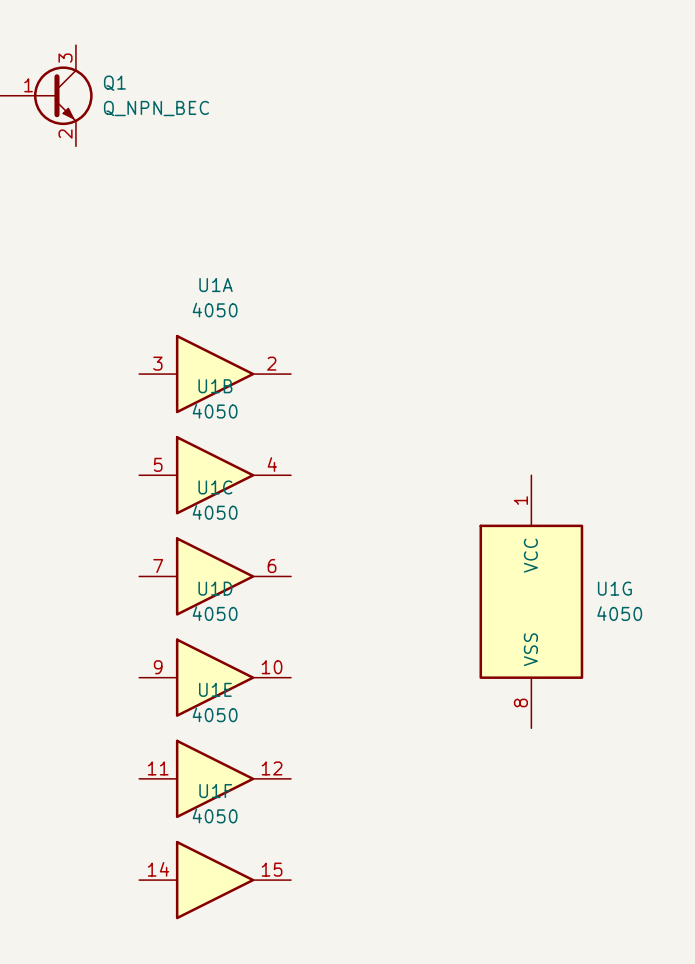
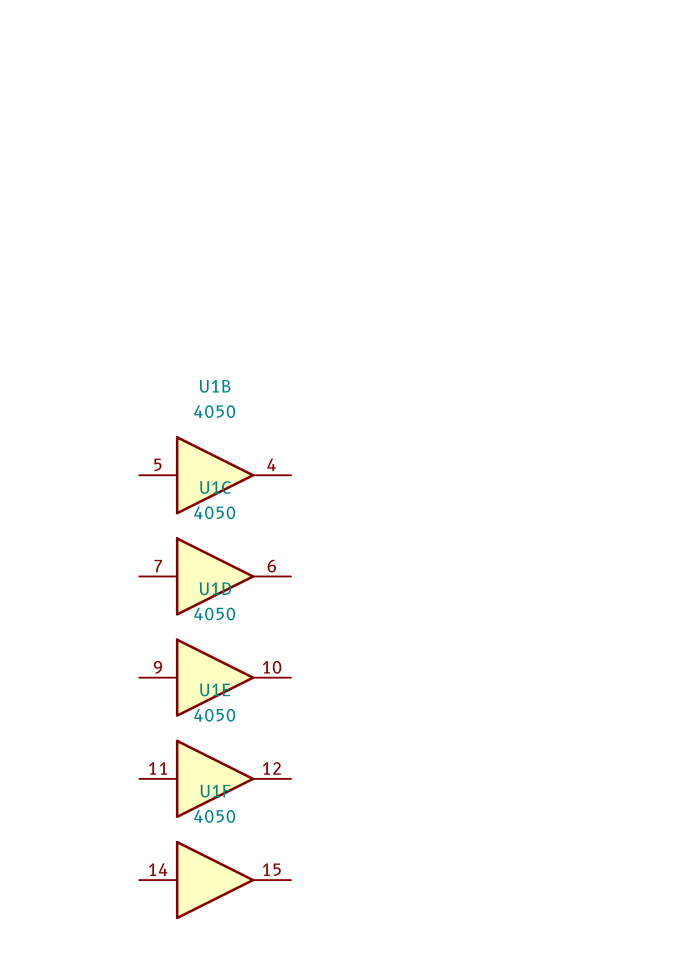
Q1: Q_NPN_BEC (46, 95) -> none
U1A: 4050 (215, 374) -> none
U1G: 4050 (531, 601) -> none

